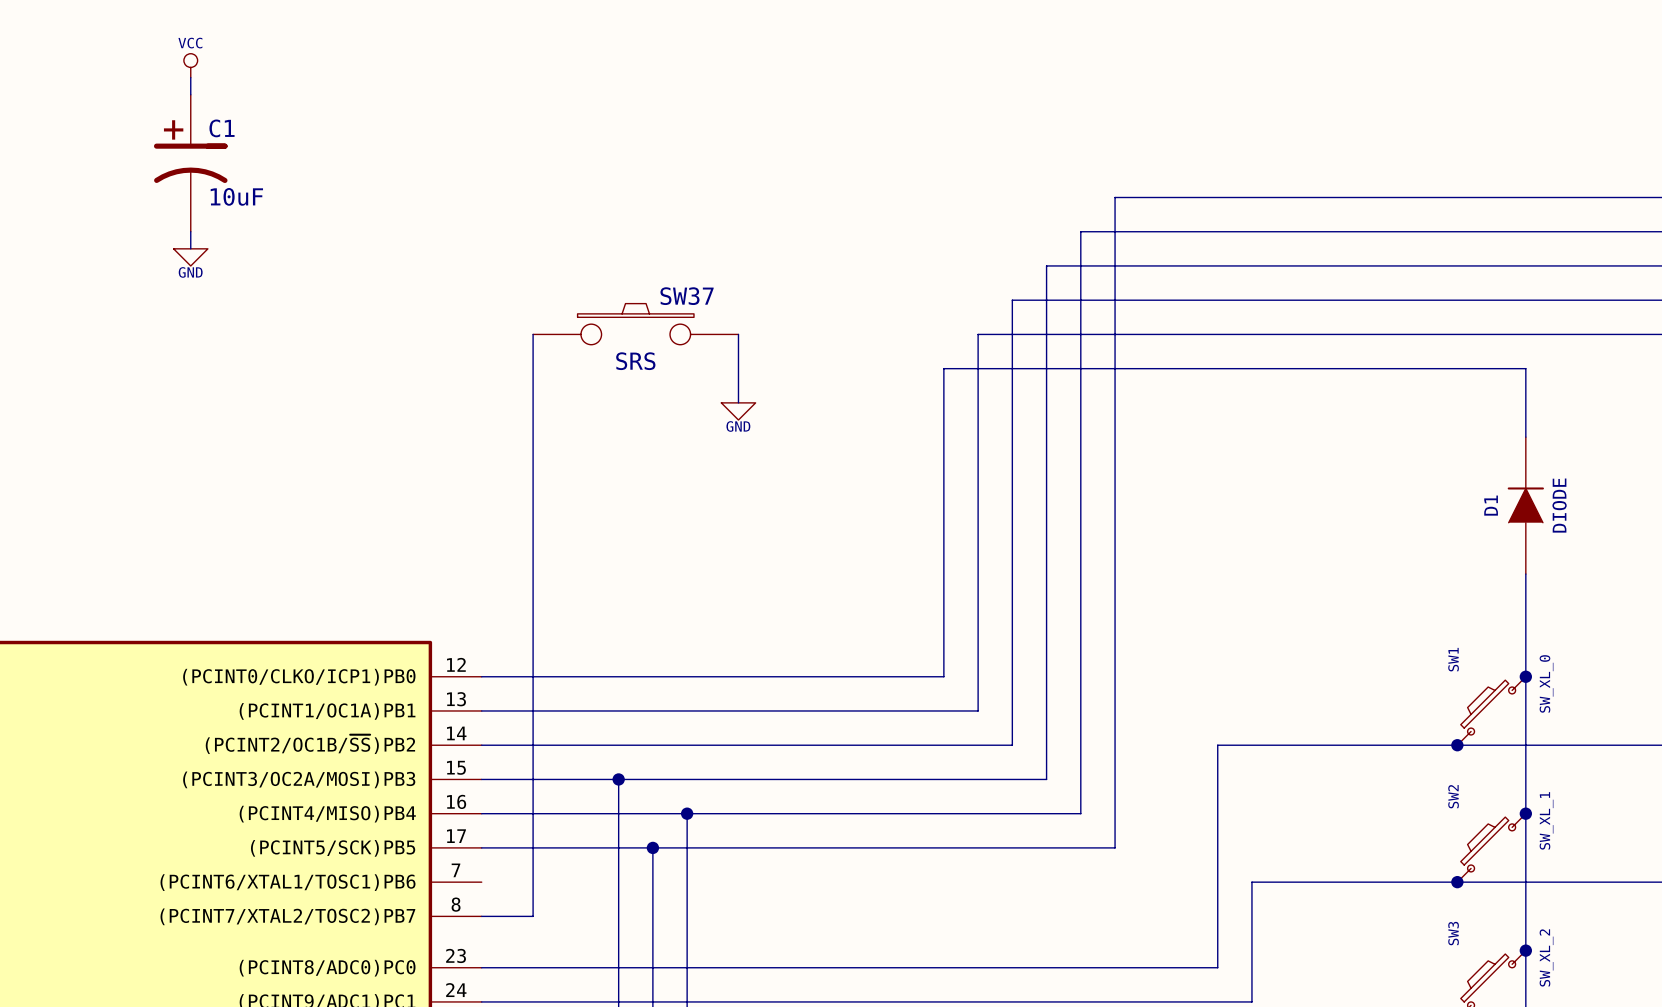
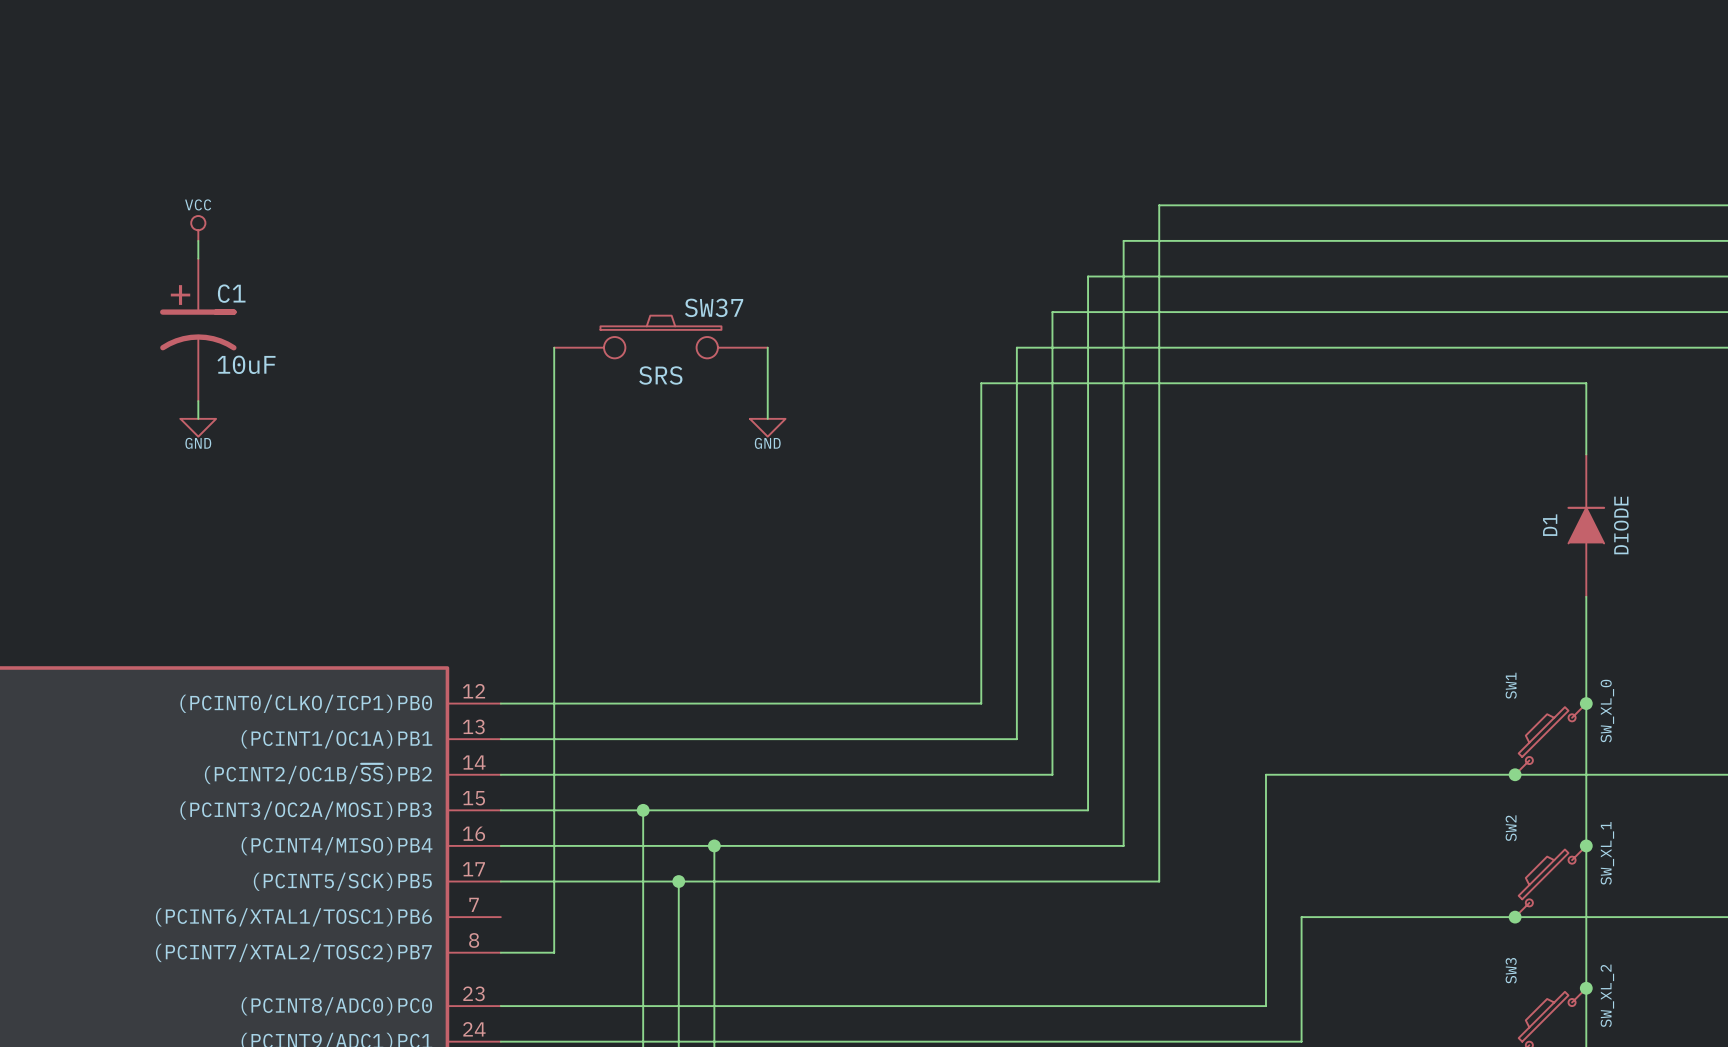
power symbol: VCC (190, 65) -> none
wire: (190, 77) (190, 94) -> (198, 401) (198, 418)
C1 position: (190, 163) -> (198, 329)
power symbol: none -> VCC (198, 228)
power symbol: GND (190, 257) -> none
power symbol: none -> GND (198, 427)

